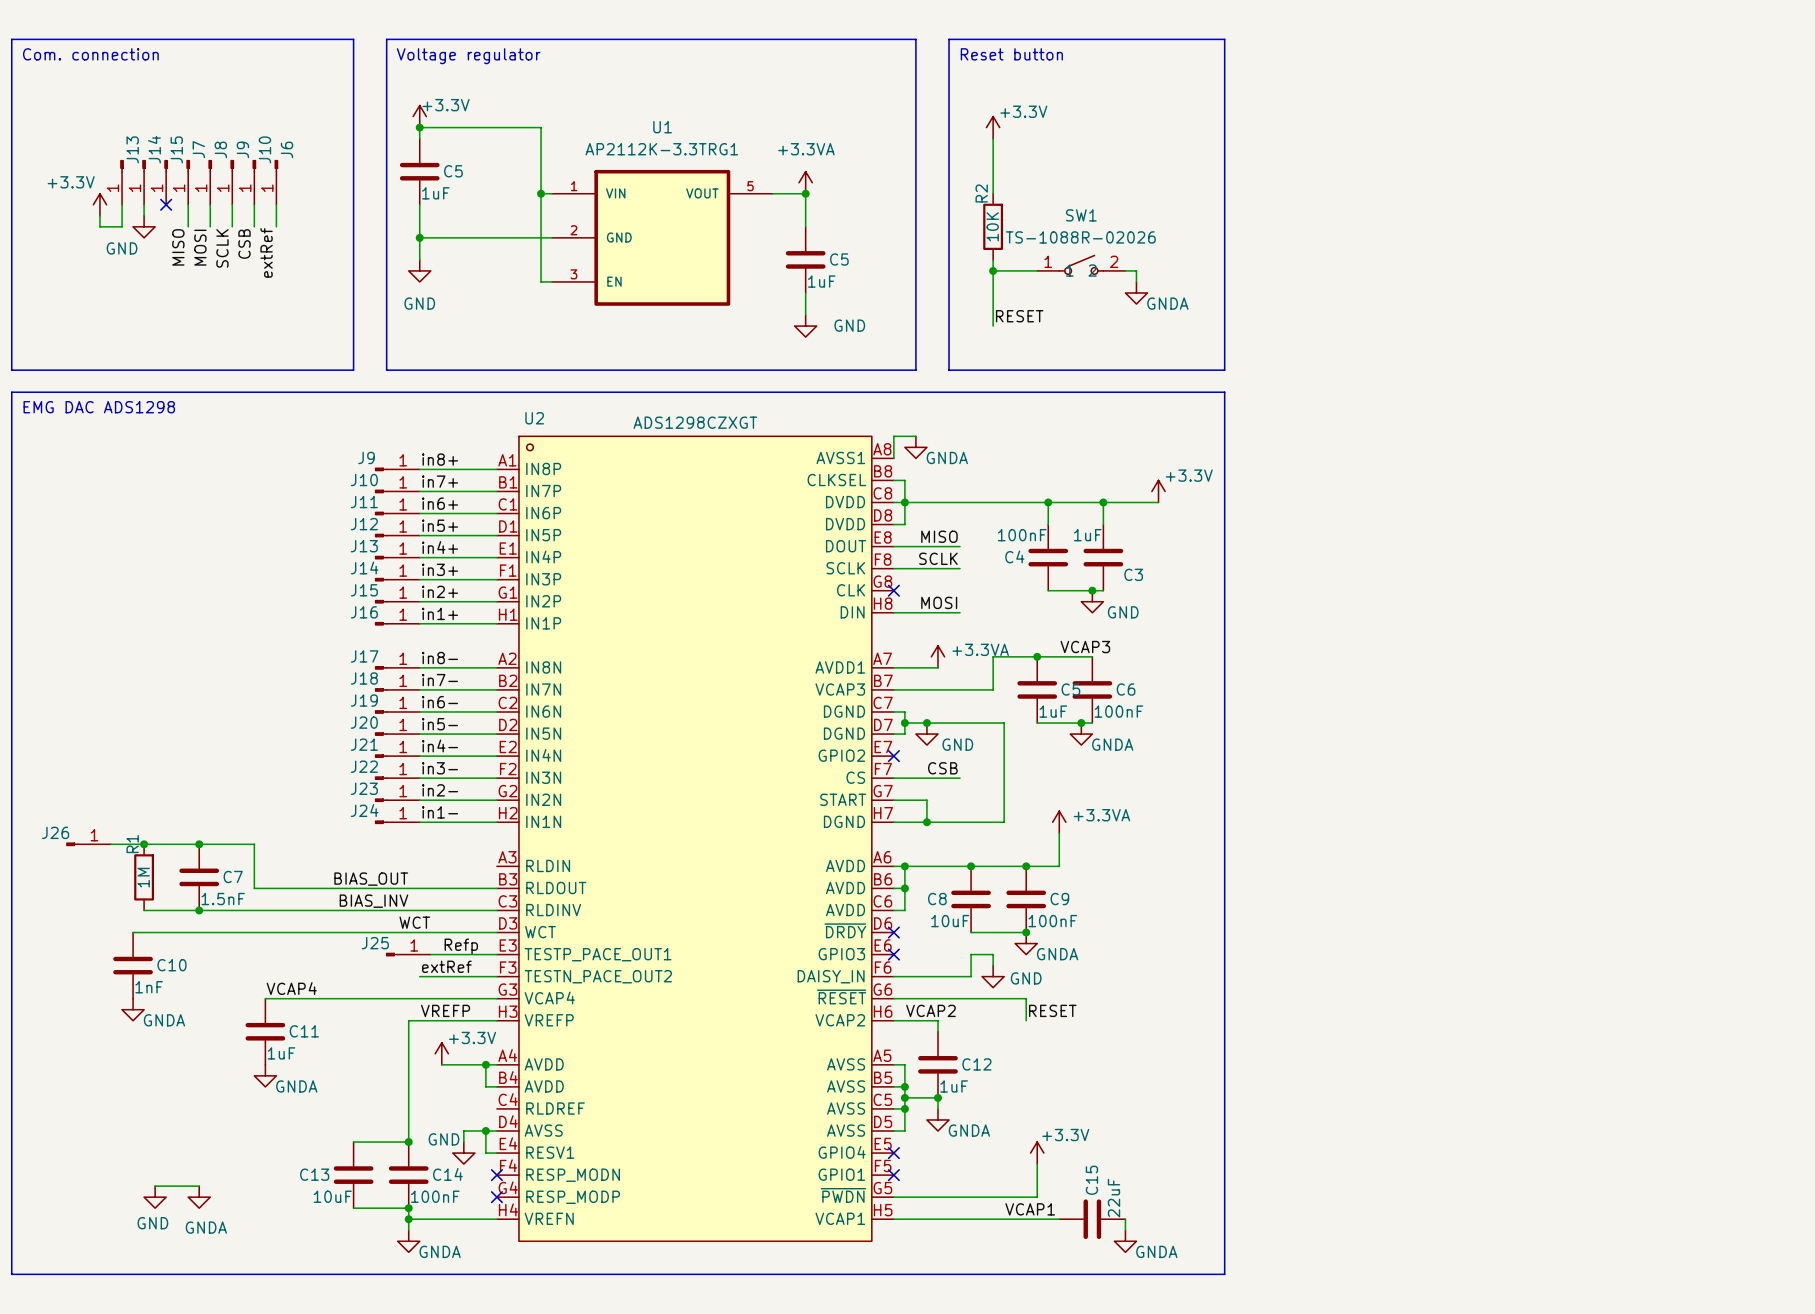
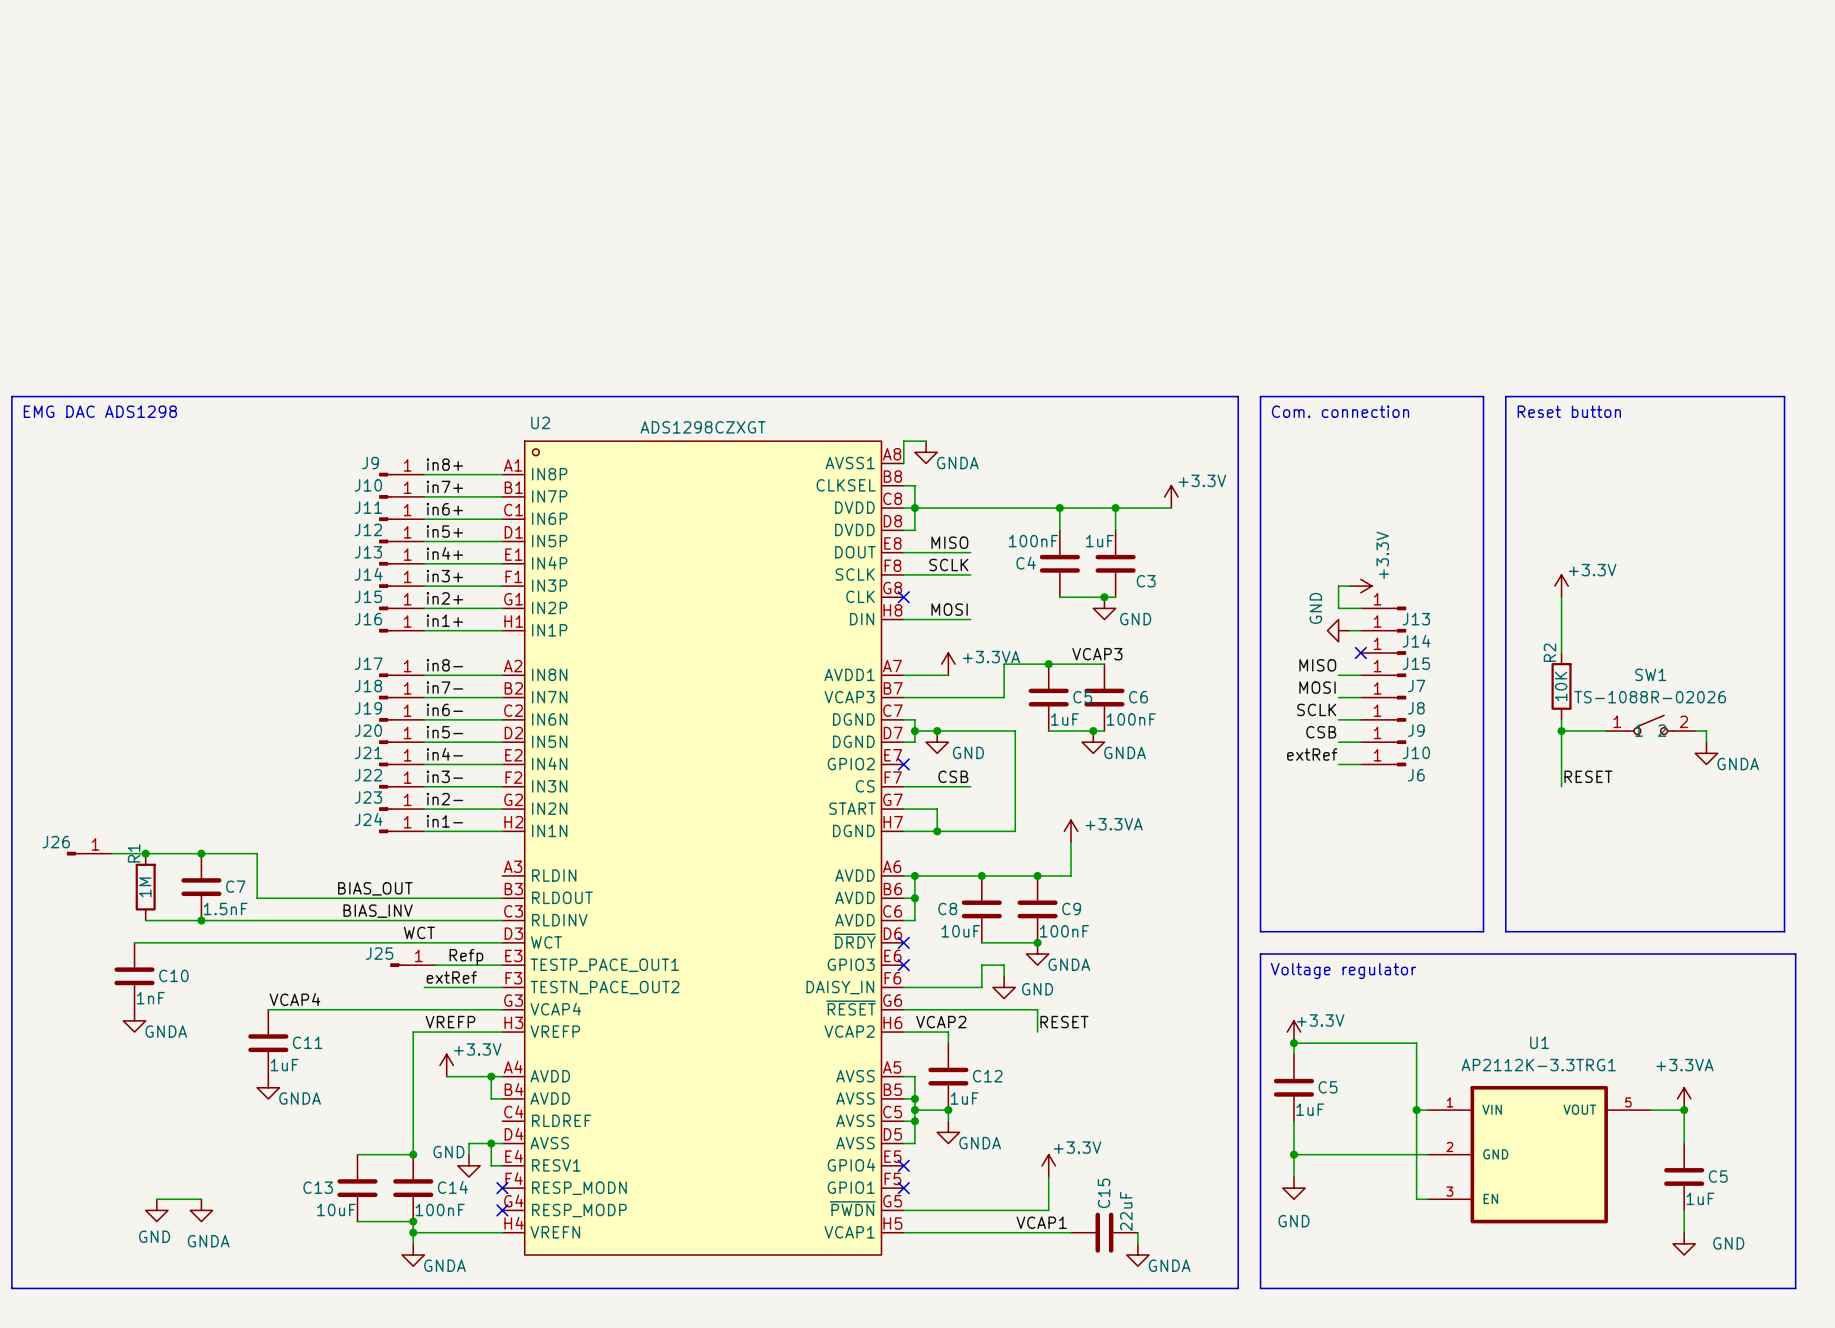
line: (11, 39) (11, 370) (353, 370) (353, 39) (11, 39) -> none
line: (386, 39) (915, 39) (915, 370) (386, 370) (386, 39) -> none
line: (949, 39) (1224, 39) (1224, 370) (949, 370) (949, 39) -> none
text: Com. connection (90, 54) -> none
text: Reset button (1011, 54) -> none
text: Voltage regulator (468, 56) -> none
power symbol: +3.3V (419, 116) -> none
junction: (419, 127) -> none
power symbol: +3.3V (993, 127) -> none
wire: (419, 138) (419, 127) (541, 127) (541, 281) (552, 281) -> none
wire: (993, 138) (993, 193) -> none
J7 rotation: 0° (188, 166) -> 90° clockwise (1399, 675)
J8 rotation: 0° (210, 166) -> 90° clockwise (1399, 697)
J6 rotation: 0° (276, 166) -> 90° clockwise (1399, 764)
C5: 1uF (419, 171) -> none
J13: (122, 182) -> none
J14: (144, 182) -> none
J15: (166, 182) -> none
J7 position: (188, 182) -> (1383, 675)
J8 position: (210, 182) -> (1383, 697)
J9: (232, 182) -> none
J10: (254, 182) -> none
J6 position: (276, 182) -> (1383, 764)
power symbol: +3.3VA (805, 182) -> none
wire: (541, 193) (552, 193) -> none
junction: (541, 193) -> none
wire: (772, 193) (805, 193) (805, 226) -> none
junction: (805, 193) -> none
power symbol: +3.3V (99, 204) -> none
wire: (122, 204) (122, 226) (99, 226) (99, 215) -> none
wire: (144, 204) (144, 215) -> none
no-connect mark: (166, 204) -> none
wire: (188, 204) (188, 226) -> none
wire: (210, 204) (210, 226) -> none
wire: (232, 204) (232, 226) -> none
wire: (254, 204) (254, 226) -> none
wire: (276, 204) (276, 226) -> none
wire: (419, 204) (419, 259) -> none
power symbol: GND (144, 226) -> none
R2 position: (993, 226) -> (1561, 686)
wire: (419, 237) (552, 237) -> none
junction: (419, 237) -> none
U1 position: (662, 237) -> (1539, 1154)
label: CSB (244, 243) -> none
label: MISO (178, 247) -> none
label: MOSI (200, 247) -> none
label: SCLK (222, 248) -> none
label: extRef (266, 252) -> none
C5: 1uF (805, 259) -> none
wire: (993, 259) (993, 326) -> none
SW1 position: (1081, 264) -> (1650, 724)
power symbol: GND (419, 270) -> none
wire: (993, 270) (1037, 270) -> none
junction: (993, 270) -> none
wire: (1125, 270) (1136, 270) (1136, 281) -> none
wire: (805, 292) (805, 315) -> none
power symbol: GNDA (1136, 292) -> none
label: RESET (1019, 316) -> none
power symbol: GND (805, 326) -> none
line: none -> (1260, 396) (1483, 396) (1483, 931) (1260, 931) (1260, 396)
line: none -> (1505, 396) (1784, 396) (1784, 931) (1505, 931) (1505, 396)
text: none -> Com. connection (1340, 411)
text: none -> Reset button (1569, 411)
wire: none -> (1349, 586) (1338, 586) (1338, 608) (1360, 608)
power symbol: none -> +3.3V (1360, 586)
power symbol: none -> +3.3V (1561, 586)
wire: none -> (1561, 597) (1561, 652)
J13: none -> (1383, 608)
power symbol: none -> GND (1338, 630)
wire: none -> (1349, 630) (1360, 630)
J14: none -> (1383, 630)
no-connect mark: none -> (1360, 652)
J15: none -> (1383, 652)
label: none -> MISO (1317, 665)
wire: none -> (1338, 675) (1360, 675)
label: none -> MOSI (1317, 687)
wire: none -> (1338, 697) (1360, 697)
label: none -> SCLK (1316, 709)
wire: none -> (1338, 719) (1360, 719)
J9: none -> (1383, 719)
wire: none -> (1561, 719) (1561, 786)
wire: none -> (1561, 731) (1606, 731)
junction: none -> (1561, 731)
wire: none -> (1695, 731) (1706, 731) (1706, 742)
label: none -> CSB (1321, 732)
wire: none -> (1338, 742) (1360, 742)
J10: none -> (1383, 742)
power symbol: none -> GNDA (1706, 753)
label: none -> extRef (1312, 754)
wire: none -> (1338, 764) (1360, 764)
label: none -> RESET (1588, 776)
line: none -> (1260, 954) (1795, 954) (1795, 1288) (1260, 1288) (1260, 954)
text: none -> Voltage regulator (1343, 970)
power symbol: none -> +3.3V (1293, 1032)
junction: none -> (1293, 1043)
wire: none -> (1293, 1054) (1293, 1043) (1416, 1043) (1416, 1199) (1427, 1199)
C5: none -> 1uF (1293, 1087)
power symbol: none -> +3.3VA (1684, 1098)
wire: none -> (1416, 1110) (1427, 1110)
junction: none -> (1416, 1110)
wire: none -> (1650, 1110) (1684, 1110) (1684, 1143)
junction: none -> (1684, 1110)
wire: none -> (1293, 1121) (1293, 1176)
wire: none -> (1293, 1154) (1427, 1154)
junction: none -> (1293, 1154)
C5: none -> 1uF (1684, 1176)
power symbol: none -> GND (1293, 1188)
wire: none -> (1684, 1210) (1684, 1232)
power symbol: none -> GND (1684, 1243)

